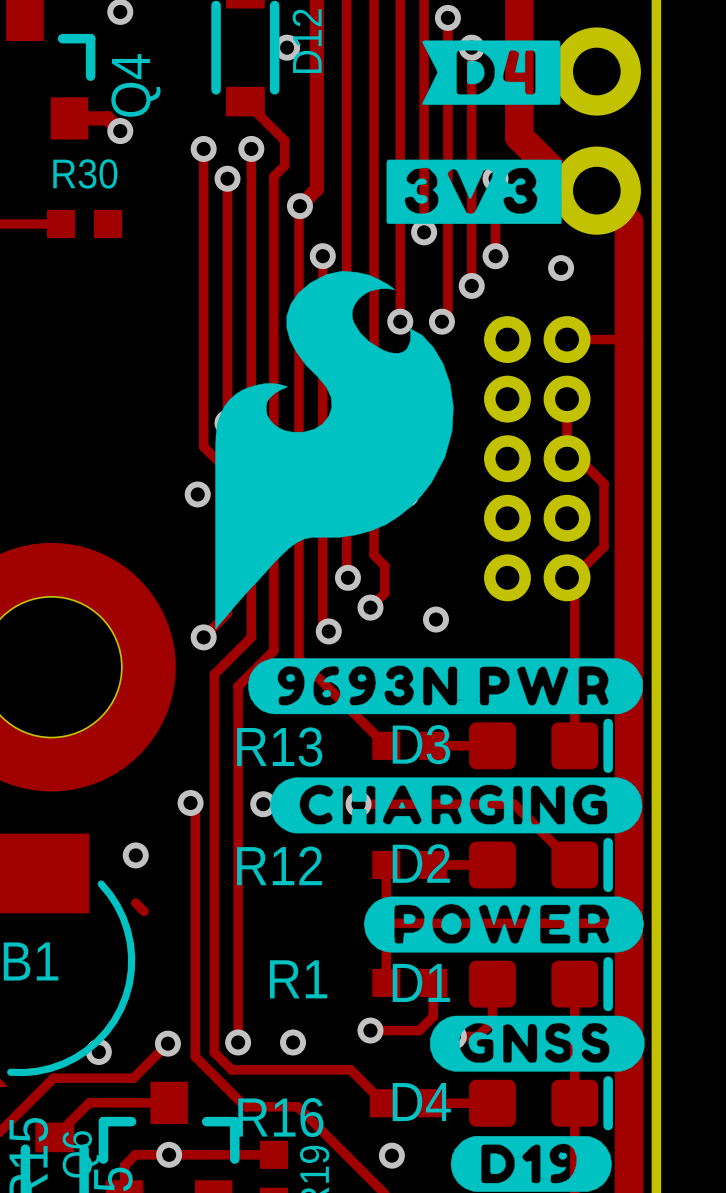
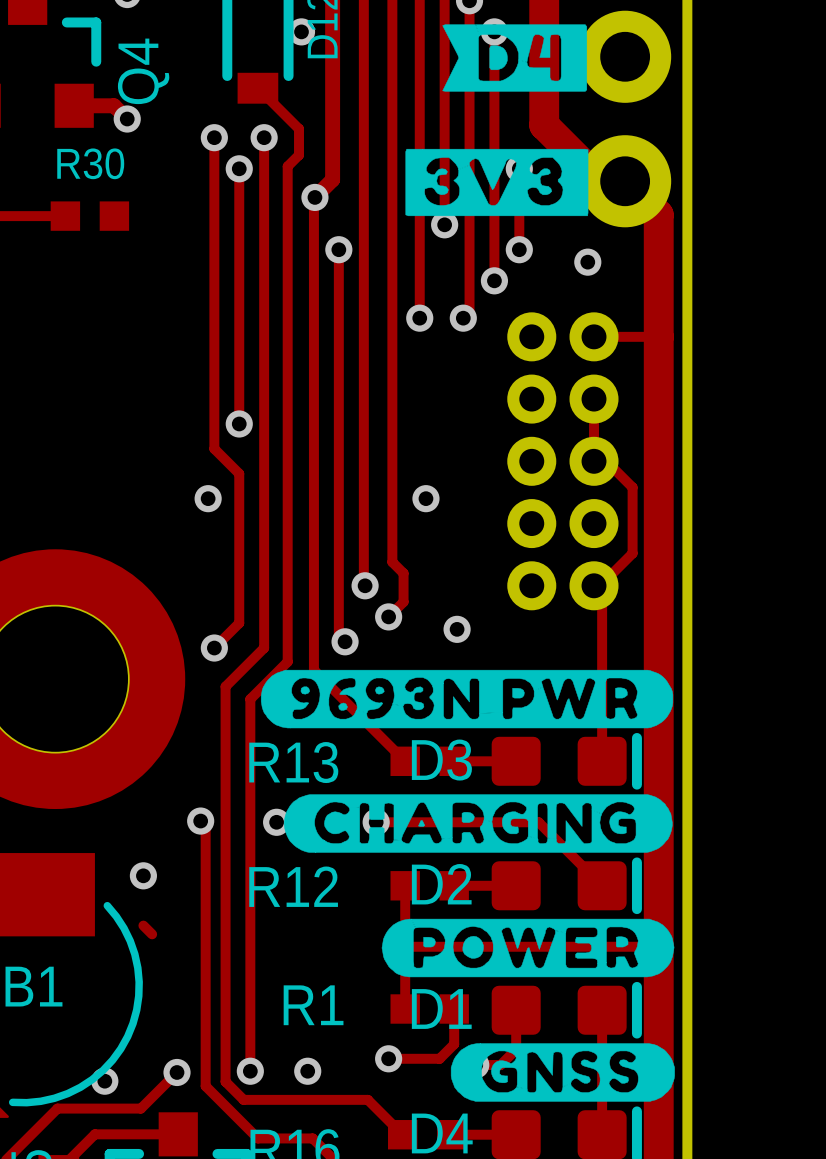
drawing: [215, 271, 454, 630] -> none

